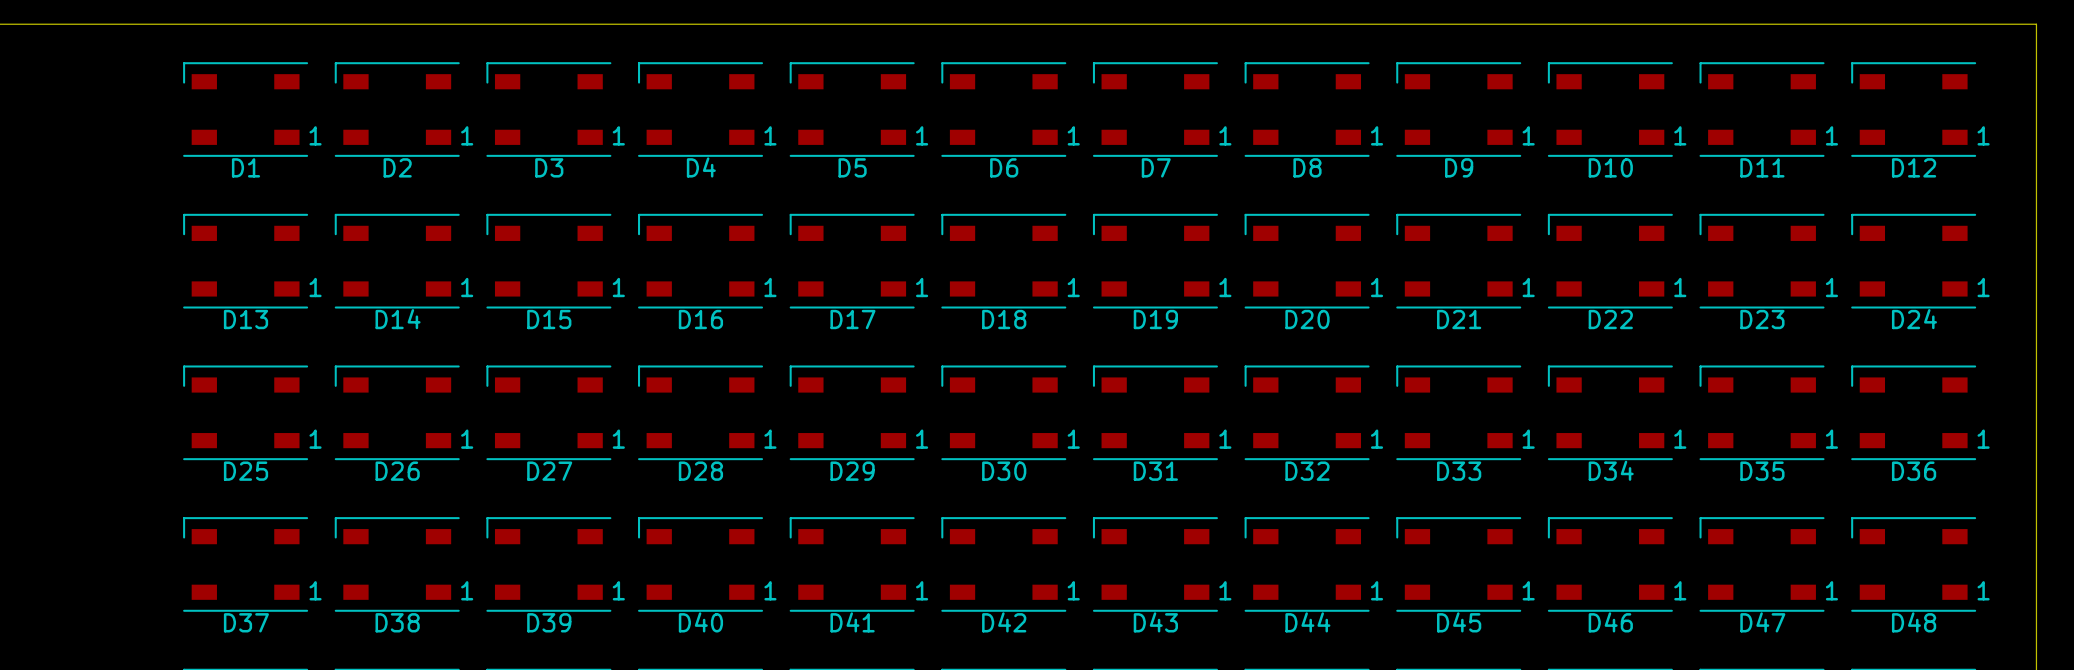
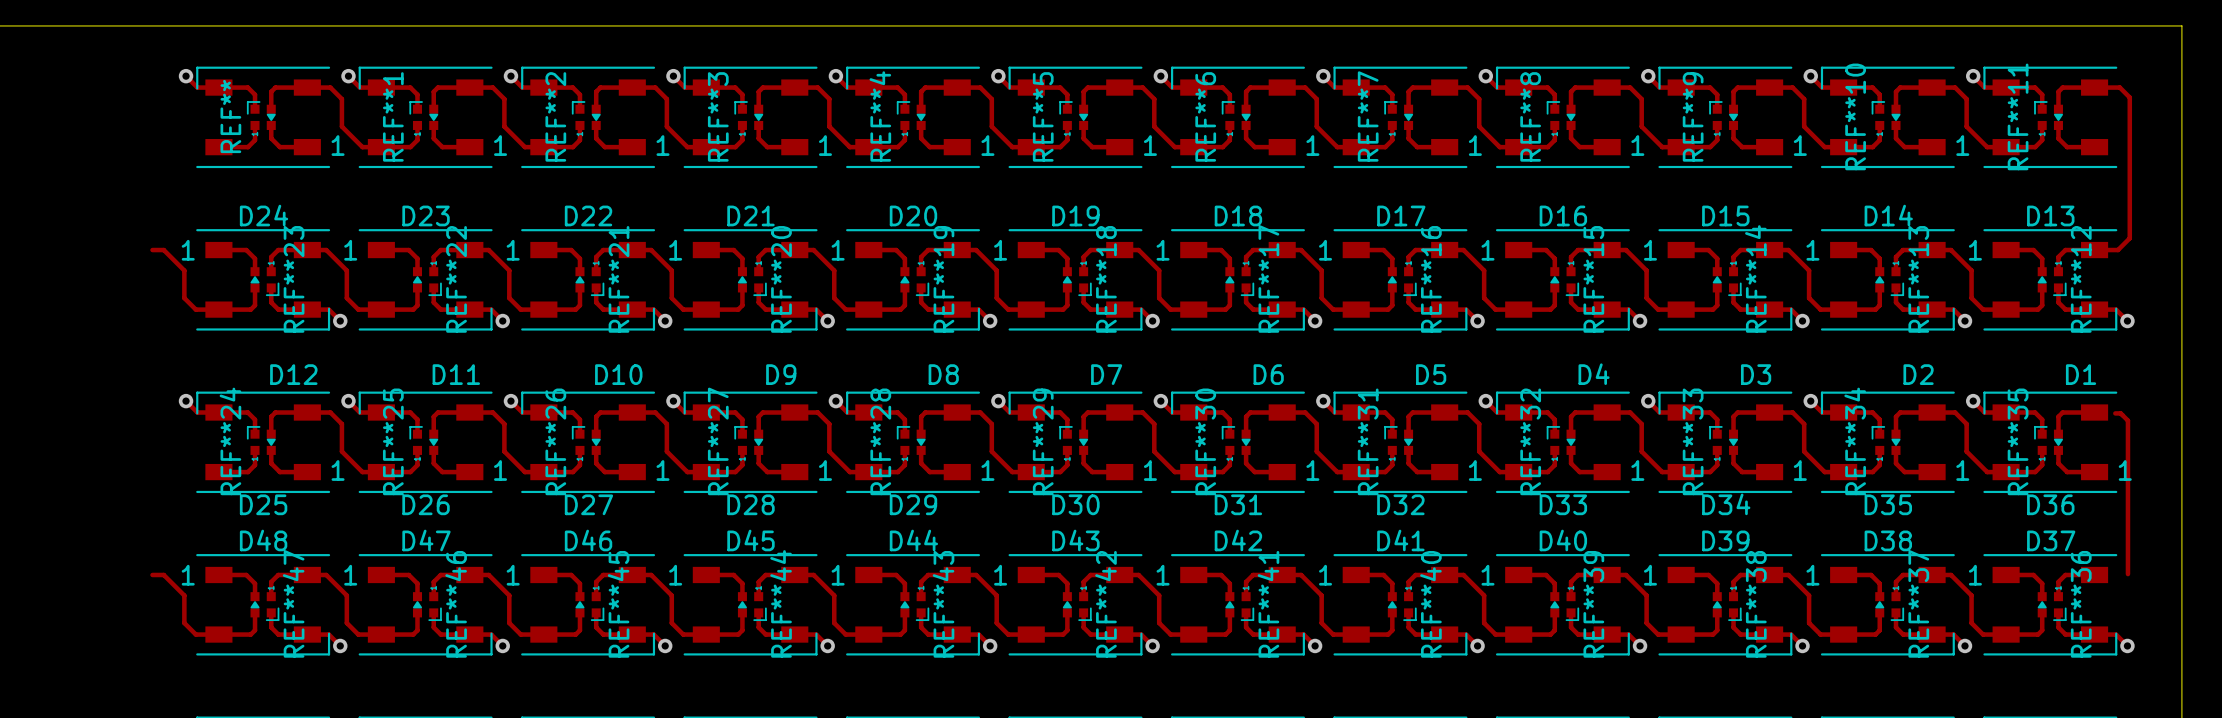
track: none -> (186, 76) (197, 87) (247, 87) (255, 94) (255, 109)
via: none -> (186, 76)
track: none -> (348, 76) (359, 87) (410, 87) (417, 94) (417, 109)
via: none -> (348, 76)
track: none -> (510, 76) (522, 87) (572, 87) (579, 94) (579, 109)
via: none -> (510, 76)
track: none -> (673, 76) (684, 87) (735, 87) (742, 94) (742, 109)
via: none -> (673, 76)
track: none -> (835, 76) (847, 87) (897, 87) (904, 94) (904, 109)
via: none -> (835, 76)
track: none -> (998, 76) (1009, 87) (1060, 87) (1067, 94) (1067, 109)
via: none -> (998, 76)
track: none -> (1160, 76) (1172, 87) (1222, 87) (1229, 94) (1229, 109)
via: none -> (1160, 76)
track: none -> (1323, 76) (1334, 87) (1385, 87) (1392, 94) (1392, 109)
via: none -> (1323, 76)
track: none -> (1485, 76) (1497, 87) (1547, 87) (1554, 94) (1554, 109)
via: none -> (1485, 76)
track: none -> (1648, 76) (1659, 87) (1710, 87) (1717, 94) (1717, 109)
via: none -> (1648, 76)
track: none -> (1810, 76) (1822, 87) (1872, 87) (1879, 94) (1879, 109)
via: none -> (1810, 76)
track: none -> (1973, 76) (1984, 87) (2035, 87) (2042, 94) (2042, 109)
via: none -> (1973, 76)
track: none -> (2094, 87) (2062, 87) (2058, 91) (2058, 109)
track: none -> (2102, 87) (2119, 87) (2129, 97) (2129, 238) (2118, 250) (2102, 250)
track: none -> (271, 109) (271, 91) (275, 87) (330, 87) (341, 99) (341, 126) (362, 147) (373, 147)
track: none -> (433, 109) (433, 91) (437, 87) (492, 87) (504, 99) (504, 126) (524, 147) (536, 147)
track: none -> (596, 109) (596, 91) (600, 87) (655, 87) (666, 99) (666, 126) (687, 147) (698, 147)
track: none -> (758, 109) (758, 91) (762, 87) (817, 87) (829, 99) (829, 126) (849, 147) (861, 147)
track: none -> (921, 109) (921, 91) (925, 87) (980, 87) (991, 99) (991, 126) (1012, 147) (1023, 147)
track: none -> (1083, 109) (1083, 91) (1087, 87) (1142, 87) (1154, 99) (1154, 126) (1174, 147) (1186, 147)
track: none -> (1246, 109) (1246, 91) (1250, 87) (1305, 87) (1316, 99) (1316, 126) (1337, 147) (1348, 147)
track: none -> (1408, 109) (1408, 91) (1412, 87) (1467, 87) (1479, 99) (1479, 126) (1499, 147) (1511, 147)
track: none -> (1571, 109) (1571, 91) (1575, 87) (1630, 87) (1641, 99) (1641, 126) (1662, 147) (1673, 147)
track: none -> (1733, 109) (1733, 91) (1737, 87) (1792, 87) (1804, 99) (1804, 126) (1824, 147) (1836, 147)
track: none -> (1895, 109) (1895, 91) (1900, 87) (1955, 87) (1966, 99) (1966, 126) (1987, 147) (1998, 147)
REF**: none -> (261, 115)
REF**1: none -> (423, 115)
REF**2: none -> (586, 115)
REF**3: none -> (748, 115)
REF**4: none -> (911, 115)
REF**5: none -> (1073, 115)
REF**6: none -> (1236, 115)
REF**7: none -> (1398, 115)
REF**8: none -> (1561, 115)
REF**9: none -> (1723, 115)
REF**10: none -> (1886, 115)
REF**11: none -> (2048, 115)
track: none -> (255, 125) (255, 140) (248, 147) (218, 147)
track: none -> (271, 125) (271, 138) (279, 147) (307, 147)
track: none -> (417, 125) (417, 140) (410, 147) (381, 147)
track: none -> (433, 125) (433, 138) (442, 147) (469, 147)
track: none -> (579, 125) (579, 140) (572, 147) (543, 147)
track: none -> (596, 125) (596, 138) (604, 147) (632, 147)
track: none -> (742, 125) (742, 140) (735, 147) (706, 147)
track: none -> (758, 125) (758, 138) (767, 147) (794, 147)
track: none -> (904, 125) (904, 140) (897, 147) (868, 147)
track: none -> (921, 125) (921, 138) (929, 147) (957, 147)
track: none -> (1067, 125) (1067, 140) (1060, 147) (1031, 147)
track: none -> (1083, 125) (1083, 138) (1092, 147) (1119, 147)
track: none -> (1229, 125) (1229, 140) (1222, 147) (1193, 147)
track: none -> (1246, 125) (1246, 138) (1254, 147) (1282, 147)
track: none -> (1392, 125) (1392, 140) (1385, 147) (1356, 147)
track: none -> (1408, 125) (1408, 138) (1417, 147) (1444, 147)
track: none -> (1554, 125) (1554, 140) (1547, 147) (1518, 147)
track: none -> (1571, 125) (1571, 138) (1579, 147) (1607, 147)
track: none -> (1717, 125) (1717, 140) (1710, 147) (1681, 147)
track: none -> (1733, 125) (1733, 138) (1742, 147) (1769, 147)
track: none -> (1879, 125) (1879, 140) (1872, 147) (1843, 147)
track: none -> (1895, 125) (1895, 138) (1904, 147) (1932, 147)
track: none -> (2042, 125) (2042, 140) (2035, 147) (2006, 147)
track: none -> (2058, 125) (2058, 138) (2067, 147) (2094, 147)
D12 text: 1 (1983, 135) -> none
D1 name position: D1 (246, 167) -> D1 (2081, 374)
D2 name position: D2 (397, 167) -> D2 (1918, 374)
D3 name position: D3 (549, 167) -> D3 (1756, 374)
D4 name position: D4 (701, 167) -> D4 (1594, 374)
D5 name position: D5 (852, 167) -> D5 (1431, 374)
D6 name position: D6 (1004, 167) -> D6 (1268, 374)
D7 name position: D7 (1156, 167) -> D7 (1106, 374)
D8 name position: D8 (1307, 167) -> D8 (943, 374)
D9 name position: D9 (1459, 167) -> D9 (781, 374)
D10 name position: D10 (1610, 167) -> D10 (618, 374)
D11 name position: D11 (1762, 167) -> D11 (456, 374)
D12 name position: D12 (1914, 167) -> D12 (293, 374)
track: none -> (152, 250) (163, 250) (184, 270) (184, 298) (195, 309) (250, 309) (255, 305) (255, 287)
track: none -> (218, 250) (246, 250) (255, 258) (255, 271)
track: none -> (307, 250) (278, 250) (271, 257) (271, 271)
track: none -> (314, 250) (326, 250) (346, 270) (346, 298) (358, 309) (413, 309) (417, 305) (417, 287)
track: none -> (381, 250) (408, 250) (417, 258) (417, 271)
track: none -> (469, 250) (440, 250) (433, 257) (433, 271)
track: none -> (477, 250) (488, 250) (509, 270) (509, 298) (520, 309) (575, 309) (579, 305) (579, 287)
track: none -> (543, 250) (571, 250) (579, 258) (579, 271)
track: none -> (632, 250) (603, 250) (596, 257) (596, 271)
track: none -> (639, 250) (651, 250) (671, 270) (671, 298) (683, 309) (738, 309) (742, 305) (742, 287)
track: none -> (706, 250) (733, 250) (742, 258) (742, 271)
track: none -> (794, 250) (765, 250) (758, 257) (758, 271)
track: none -> (802, 250) (813, 250) (834, 270) (834, 298) (845, 309) (900, 309) (904, 305) (904, 287)
track: none -> (868, 250) (896, 250) (904, 258) (904, 271)
track: none -> (957, 250) (928, 250) (921, 257) (921, 271)
track: none -> (964, 250) (976, 250) (996, 270) (996, 298) (1008, 309) (1063, 309) (1067, 305) (1067, 287)
track: none -> (1031, 250) (1058, 250) (1067, 258) (1067, 271)
track: none -> (1119, 250) (1090, 250) (1083, 257) (1083, 271)
track: none -> (1127, 250) (1138, 250) (1159, 270) (1159, 298) (1170, 309) (1225, 309) (1229, 305) (1229, 287)
track: none -> (1193, 250) (1221, 250) (1229, 258) (1229, 271)
track: none -> (1282, 250) (1253, 250) (1246, 257) (1246, 271)
track: none -> (1289, 250) (1301, 250) (1321, 270) (1321, 298) (1333, 309) (1388, 309) (1392, 305) (1392, 287)
track: none -> (1356, 250) (1383, 250) (1392, 258) (1392, 271)
track: none -> (1444, 250) (1415, 250) (1408, 257) (1408, 271)
track: none -> (1452, 250) (1463, 250) (1484, 270) (1484, 298) (1495, 309) (1550, 309) (1554, 305) (1554, 287)
track: none -> (1518, 250) (1546, 250) (1554, 258) (1554, 271)
track: none -> (1607, 250) (1578, 250) (1571, 257) (1571, 271)
track: none -> (1614, 250) (1626, 250) (1646, 270) (1646, 298) (1658, 309) (1713, 309) (1717, 305) (1717, 287)
track: none -> (1681, 250) (1708, 250) (1717, 258) (1717, 271)
track: none -> (1769, 250) (1740, 250) (1733, 257) (1733, 271)
track: none -> (1777, 250) (1788, 250) (1809, 270) (1809, 298) (1820, 309) (1875, 309) (1879, 305) (1879, 287)
track: none -> (1843, 250) (1871, 250) (1879, 258) (1879, 271)
track: none -> (1932, 250) (1902, 250) (1895, 257) (1895, 271)
track: none -> (1939, 250) (1951, 250) (1971, 270) (1971, 298) (1983, 309) (2037, 309) (2042, 305) (2042, 287)
track: none -> (2006, 250) (2033, 250) (2042, 258) (2042, 271)
track: none -> (2094, 250) (2065, 250) (2058, 257) (2058, 271)
D13 rotation: 0° (245, 261) -> 180° (2050, 279)
D13 position: (245, 261) -> (2050, 279)
D14 rotation: 0° (397, 261) -> 180° (1887, 279)
D14 position: (397, 261) -> (1887, 279)
D15 rotation: 0° (548, 261) -> 180° (1725, 279)
D15 position: (548, 261) -> (1725, 279)
D16 rotation: 0° (700, 261) -> 180° (1562, 279)
D16 position: (700, 261) -> (1562, 279)
D17 rotation: 0° (852, 261) -> 180° (1400, 279)
D17 position: (852, 261) -> (1400, 279)
D18 rotation: 0° (1003, 261) -> 180° (1237, 279)
D18 position: (1003, 261) -> (1237, 279)
D19 rotation: 0° (1155, 261) -> 180° (1075, 279)
D19 position: (1155, 261) -> (1075, 279)
D20 rotation: 0° (1307, 261) -> 180° (913, 279)
D20 position: (1307, 261) -> (913, 279)
D21 rotation: 0° (1458, 261) -> 180° (750, 279)
D21 position: (1458, 261) -> (750, 279)
D22 rotation: 0° (1610, 261) -> 180° (588, 279)
D22 position: (1610, 261) -> (588, 279)
D23 rotation: 0° (1762, 261) -> 180° (425, 279)
D23 position: (1762, 261) -> (425, 279)
D24 rotation: 0° (1913, 261) -> 180° (263, 279)
D24 position: (1913, 261) -> (263, 279)
REF**23: none -> (264, 281)
REF**22: none -> (427, 281)
REF**21: none -> (589, 281)
REF**20: none -> (752, 281)
REF**19: none -> (914, 281)
REF**18: none -> (1077, 281)
REF**17: none -> (1239, 281)
REF**16: none -> (1402, 281)
REF**15: none -> (1564, 281)
REF**14: none -> (1727, 281)
REF**13: none -> (1889, 281)
REF**12: none -> (2052, 281)
track: none -> (271, 287) (271, 302) (278, 309) (328, 309) (340, 321)
track: none -> (433, 287) (433, 302) (440, 309) (491, 309) (502, 321)
track: none -> (596, 287) (596, 302) (603, 309) (653, 309) (665, 321)
track: none -> (758, 287) (758, 302) (765, 309) (816, 309) (827, 321)
track: none -> (921, 287) (921, 302) (928, 309) (978, 309) (990, 321)
track: none -> (1083, 287) (1083, 302) (1090, 309) (1141, 309) (1152, 321)
track: none -> (1246, 287) (1246, 302) (1253, 309) (1303, 309) (1315, 321)
track: none -> (1408, 287) (1408, 302) (1415, 309) (1466, 309) (1477, 321)
track: none -> (1571, 287) (1571, 302) (1578, 309) (1628, 309) (1640, 321)
track: none -> (1733, 287) (1733, 302) (1740, 309) (1791, 309) (1802, 321)
track: none -> (1895, 287) (1895, 302) (1903, 309) (1953, 309) (1964, 321)
track: none -> (2058, 287) (2058, 302) (2065, 309) (2116, 309) (2127, 321)
via: none -> (340, 321)
via: none -> (502, 321)
via: none -> (665, 321)
via: none -> (827, 321)
via: none -> (990, 321)
via: none -> (1152, 321)
via: none -> (1315, 321)
via: none -> (1477, 321)
via: none -> (1640, 321)
via: none -> (1802, 321)
via: none -> (1964, 321)
via: none -> (2127, 321)
track: none -> (186, 401) (197, 412) (247, 412) (255, 419) (255, 434)
via: none -> (186, 401)
track: none -> (348, 401) (359, 412) (410, 412) (417, 419) (417, 434)
via: none -> (348, 401)
track: none -> (510, 401) (522, 412) (572, 412) (579, 419) (579, 434)
via: none -> (510, 401)
track: none -> (673, 401) (684, 412) (735, 412) (742, 419) (742, 434)
via: none -> (673, 401)
track: none -> (835, 401) (847, 412) (897, 412) (904, 419) (904, 434)
via: none -> (835, 401)
track: none -> (998, 401) (1009, 412) (1060, 412) (1067, 419) (1067, 434)
via: none -> (998, 401)
track: none -> (1160, 401) (1172, 412) (1222, 412) (1229, 419) (1229, 434)
via: none -> (1160, 401)
track: none -> (1323, 401) (1334, 412) (1385, 412) (1392, 419) (1392, 434)
via: none -> (1323, 401)
track: none -> (1485, 401) (1497, 412) (1547, 412) (1554, 419) (1554, 434)
via: none -> (1485, 401)
track: none -> (1648, 401) (1659, 412) (1710, 412) (1717, 419) (1717, 434)
via: none -> (1648, 401)
track: none -> (1810, 401) (1822, 412) (1872, 412) (1879, 419) (1879, 434)
via: none -> (1810, 401)
track: none -> (1973, 401) (1984, 412) (2035, 412) (2042, 419) (2042, 434)
via: none -> (1973, 401)
track: none -> (2094, 412) (2062, 412) (2058, 416) (2058, 434)
track: none -> (2115, 413) (2120, 413) (2127, 420) (2127, 574)
track: none -> (271, 434) (271, 416) (275, 412) (330, 412) (341, 424) (341, 451) (362, 472) (373, 472)
track: none -> (433, 434) (433, 416) (437, 412) (492, 412) (504, 424) (504, 451) (524, 472) (536, 472)
track: none -> (596, 434) (596, 416) (600, 412) (655, 412) (666, 424) (666, 451) (687, 472) (698, 472)
track: none -> (758, 434) (758, 416) (762, 412) (817, 412) (829, 424) (829, 451) (849, 472) (861, 472)
track: none -> (921, 434) (921, 416) (925, 412) (980, 412) (991, 424) (991, 451) (1012, 472) (1023, 472)
track: none -> (1083, 434) (1083, 416) (1087, 412) (1142, 412) (1154, 424) (1154, 451) (1174, 472) (1186, 472)
track: none -> (1246, 434) (1246, 416) (1250, 412) (1305, 412) (1316, 424) (1316, 451) (1337, 472) (1348, 472)
track: none -> (1408, 434) (1408, 416) (1412, 412) (1467, 412) (1479, 424) (1479, 451) (1499, 472) (1511, 472)
track: none -> (1571, 434) (1571, 416) (1575, 412) (1630, 412) (1641, 424) (1641, 451) (1662, 472) (1673, 472)
track: none -> (1733, 434) (1733, 416) (1737, 412) (1792, 412) (1804, 424) (1804, 451) (1824, 472) (1836, 472)
track: none -> (1895, 434) (1895, 416) (1900, 412) (1955, 412) (1966, 424) (1966, 451) (1987, 472) (1998, 472)
REF**24: none -> (261, 440)
REF**25: none -> (423, 440)
REF**26: none -> (586, 440)
REF**27: none -> (748, 440)
REF**28: none -> (911, 440)
REF**29: none -> (1073, 440)
REF**30: none -> (1236, 440)
REF**31: none -> (1398, 440)
REF**32: none -> (1561, 440)
REF**33: none -> (1723, 440)
REF**34: none -> (1886, 440)
REF**35: none -> (2048, 440)
track: none -> (255, 450) (255, 465) (248, 472) (218, 472)
track: none -> (271, 450) (271, 463) (279, 472) (307, 472)
track: none -> (417, 450) (417, 465) (410, 472) (381, 472)
track: none -> (433, 450) (433, 463) (442, 472) (469, 472)
track: none -> (579, 450) (579, 465) (572, 472) (543, 472)
track: none -> (596, 450) (596, 463) (604, 472) (632, 472)
track: none -> (742, 450) (742, 465) (735, 472) (706, 472)
track: none -> (758, 450) (758, 463) (767, 472) (794, 472)
track: none -> (904, 450) (904, 465) (897, 472) (868, 472)
track: none -> (921, 450) (921, 463) (929, 472) (957, 472)
track: none -> (1067, 450) (1067, 465) (1060, 472) (1031, 472)
track: none -> (1083, 450) (1083, 463) (1092, 472) (1119, 472)
track: none -> (1229, 450) (1229, 465) (1222, 472) (1193, 472)
track: none -> (1246, 450) (1246, 463) (1254, 472) (1282, 472)
track: none -> (1392, 450) (1392, 465) (1385, 472) (1356, 472)
track: none -> (1408, 450) (1408, 463) (1417, 472) (1444, 472)
track: none -> (1554, 450) (1554, 465) (1547, 472) (1518, 472)
track: none -> (1571, 450) (1571, 463) (1579, 472) (1607, 472)
track: none -> (1717, 450) (1717, 465) (1710, 472) (1681, 472)
track: none -> (1733, 450) (1733, 463) (1742, 472) (1769, 472)
track: none -> (1879, 450) (1879, 465) (1872, 472) (1843, 472)
track: none -> (1895, 450) (1895, 463) (1904, 472) (1932, 472)
track: none -> (2042, 450) (2042, 465) (2035, 472) (2006, 472)
track: none -> (2058, 450) (2058, 463) (2067, 472) (2094, 472)
track: none -> (152, 574) (163, 574) (184, 595) (184, 623) (195, 634) (250, 634) (255, 630) (255, 612)
track: none -> (218, 574) (246, 574) (255, 583) (255, 596)
track: none -> (307, 574) (278, 574) (271, 581) (271, 596)
track: none -> (314, 574) (326, 574) (346, 595) (346, 623) (358, 634) (413, 634) (417, 630) (417, 612)
track: none -> (381, 574) (408, 574) (417, 583) (417, 596)
track: none -> (469, 574) (440, 574) (433, 581) (433, 596)
track: none -> (477, 574) (488, 574) (509, 595) (509, 623) (520, 634) (575, 634) (579, 630) (579, 612)
track: none -> (543, 574) (571, 574) (579, 583) (579, 596)
track: none -> (632, 574) (603, 574) (596, 581) (596, 596)
track: none -> (639, 574) (651, 574) (671, 595) (671, 623) (683, 634) (738, 634) (742, 630) (742, 612)
track: none -> (706, 574) (733, 574) (742, 583) (742, 596)
track: none -> (794, 574) (765, 574) (758, 581) (758, 596)
track: none -> (802, 574) (813, 574) (834, 595) (834, 623) (845, 634) (900, 634) (904, 630) (904, 612)
track: none -> (868, 574) (896, 574) (904, 583) (904, 596)
track: none -> (957, 574) (928, 574) (921, 581) (921, 596)
track: none -> (964, 574) (976, 574) (996, 595) (996, 623) (1008, 634) (1063, 634) (1067, 630) (1067, 612)
track: none -> (1031, 574) (1058, 574) (1067, 583) (1067, 596)
track: none -> (1119, 574) (1090, 574) (1083, 581) (1083, 596)
track: none -> (1127, 574) (1138, 574) (1159, 595) (1159, 623) (1170, 634) (1225, 634) (1229, 630) (1229, 612)
track: none -> (1193, 574) (1221, 574) (1229, 583) (1229, 596)
track: none -> (1282, 574) (1253, 574) (1246, 581) (1246, 596)
track: none -> (1289, 574) (1301, 574) (1321, 595) (1321, 623) (1333, 634) (1388, 634) (1392, 630) (1392, 612)
track: none -> (1356, 574) (1383, 574) (1392, 583) (1392, 596)
track: none -> (1444, 574) (1415, 574) (1408, 581) (1408, 596)
track: none -> (1452, 574) (1463, 574) (1484, 595) (1484, 623) (1495, 634) (1550, 634) (1554, 630) (1554, 612)
track: none -> (1518, 574) (1546, 574) (1554, 583) (1554, 596)
track: none -> (1607, 574) (1578, 574) (1571, 581) (1571, 596)
track: none -> (1614, 574) (1626, 574) (1646, 595) (1646, 623) (1658, 634) (1713, 634) (1717, 630) (1717, 612)
track: none -> (1681, 574) (1708, 574) (1717, 583) (1717, 596)
track: none -> (1769, 574) (1740, 574) (1733, 581) (1733, 596)
track: none -> (1777, 574) (1788, 574) (1809, 595) (1809, 623) (1820, 634) (1875, 634) (1879, 630) (1879, 612)
track: none -> (1843, 574) (1871, 574) (1879, 583) (1879, 596)
track: none -> (1932, 574) (1902, 574) (1895, 581) (1895, 596)
track: none -> (1939, 574) (1951, 574) (1971, 595) (1971, 623) (1983, 634) (2037, 634) (2042, 630) (2042, 612)
track: none -> (2006, 574) (2033, 574) (2042, 583) (2042, 596)
track: none -> (2094, 574) (2065, 574) (2058, 581) (2058, 596)
D37 rotation: 0° (245, 564) -> 180° (2050, 604)
D37 position: (245, 564) -> (2050, 604)
D38 rotation: 0° (397, 564) -> 180° (1887, 604)
D38 position: (397, 564) -> (1887, 604)
D39 rotation: 0° (548, 564) -> 180° (1725, 604)
D39 position: (548, 564) -> (1725, 604)
D40 rotation: 0° (700, 564) -> 180° (1562, 604)
D40 position: (700, 564) -> (1562, 604)
D41 rotation: 0° (852, 564) -> 180° (1400, 604)
D41 position: (852, 564) -> (1400, 604)
D42 rotation: 0° (1003, 564) -> 180° (1237, 604)
D42 position: (1003, 564) -> (1237, 604)
D43 rotation: 0° (1155, 564) -> 180° (1075, 604)
D43 position: (1155, 564) -> (1075, 604)
D44 rotation: 0° (1307, 564) -> 180° (913, 604)
D44 position: (1307, 564) -> (913, 604)
D45 rotation: 0° (1458, 564) -> 180° (750, 604)
D45 position: (1458, 564) -> (750, 604)
D46 rotation: 0° (1610, 564) -> 180° (588, 604)
D46 position: (1610, 564) -> (588, 604)
D47 rotation: 0° (1762, 564) -> 180° (425, 604)
D47 position: (1762, 564) -> (425, 604)
D48 rotation: 0° (1913, 564) -> 180° (263, 604)
D48 position: (1913, 564) -> (263, 604)
REF**47: none -> (264, 606)
REF**46: none -> (427, 606)
REF**45: none -> (589, 606)
REF**44: none -> (752, 606)
REF**43: none -> (914, 606)
REF**42: none -> (1077, 606)
REF**41: none -> (1239, 606)
REF**40: none -> (1402, 606)
REF**39: none -> (1564, 606)
REF**38: none -> (1727, 606)
REF**37: none -> (1889, 606)
REF**36: none -> (2052, 606)
track: none -> (271, 612) (271, 627) (278, 634) (328, 634) (340, 645)
track: none -> (433, 612) (433, 627) (440, 634) (491, 634) (502, 645)
track: none -> (596, 612) (596, 627) (603, 634) (653, 634) (665, 645)
track: none -> (758, 612) (758, 627) (765, 634) (816, 634) (827, 645)
track: none -> (921, 612) (921, 627) (928, 634) (978, 634) (990, 645)
track: none -> (1083, 612) (1083, 627) (1090, 634) (1141, 634) (1152, 645)
track: none -> (1246, 612) (1246, 627) (1253, 634) (1303, 634) (1315, 645)
track: none -> (1408, 612) (1408, 627) (1415, 634) (1466, 634) (1477, 645)
track: none -> (1571, 612) (1571, 627) (1578, 634) (1628, 634) (1640, 645)
track: none -> (1733, 612) (1733, 627) (1740, 634) (1791, 634) (1802, 645)
track: none -> (1895, 612) (1895, 627) (1903, 634) (1953, 634) (1964, 645)
track: none -> (2058, 612) (2058, 627) (2065, 634) (2116, 634) (2127, 645)
via: none -> (340, 645)
via: none -> (502, 645)
via: none -> (665, 645)
via: none -> (827, 645)
via: none -> (990, 645)
via: none -> (1152, 645)
via: none -> (1315, 645)
via: none -> (1477, 645)
via: none -> (1640, 645)
via: none -> (1802, 645)
via: none -> (1964, 645)
via: none -> (2127, 645)

